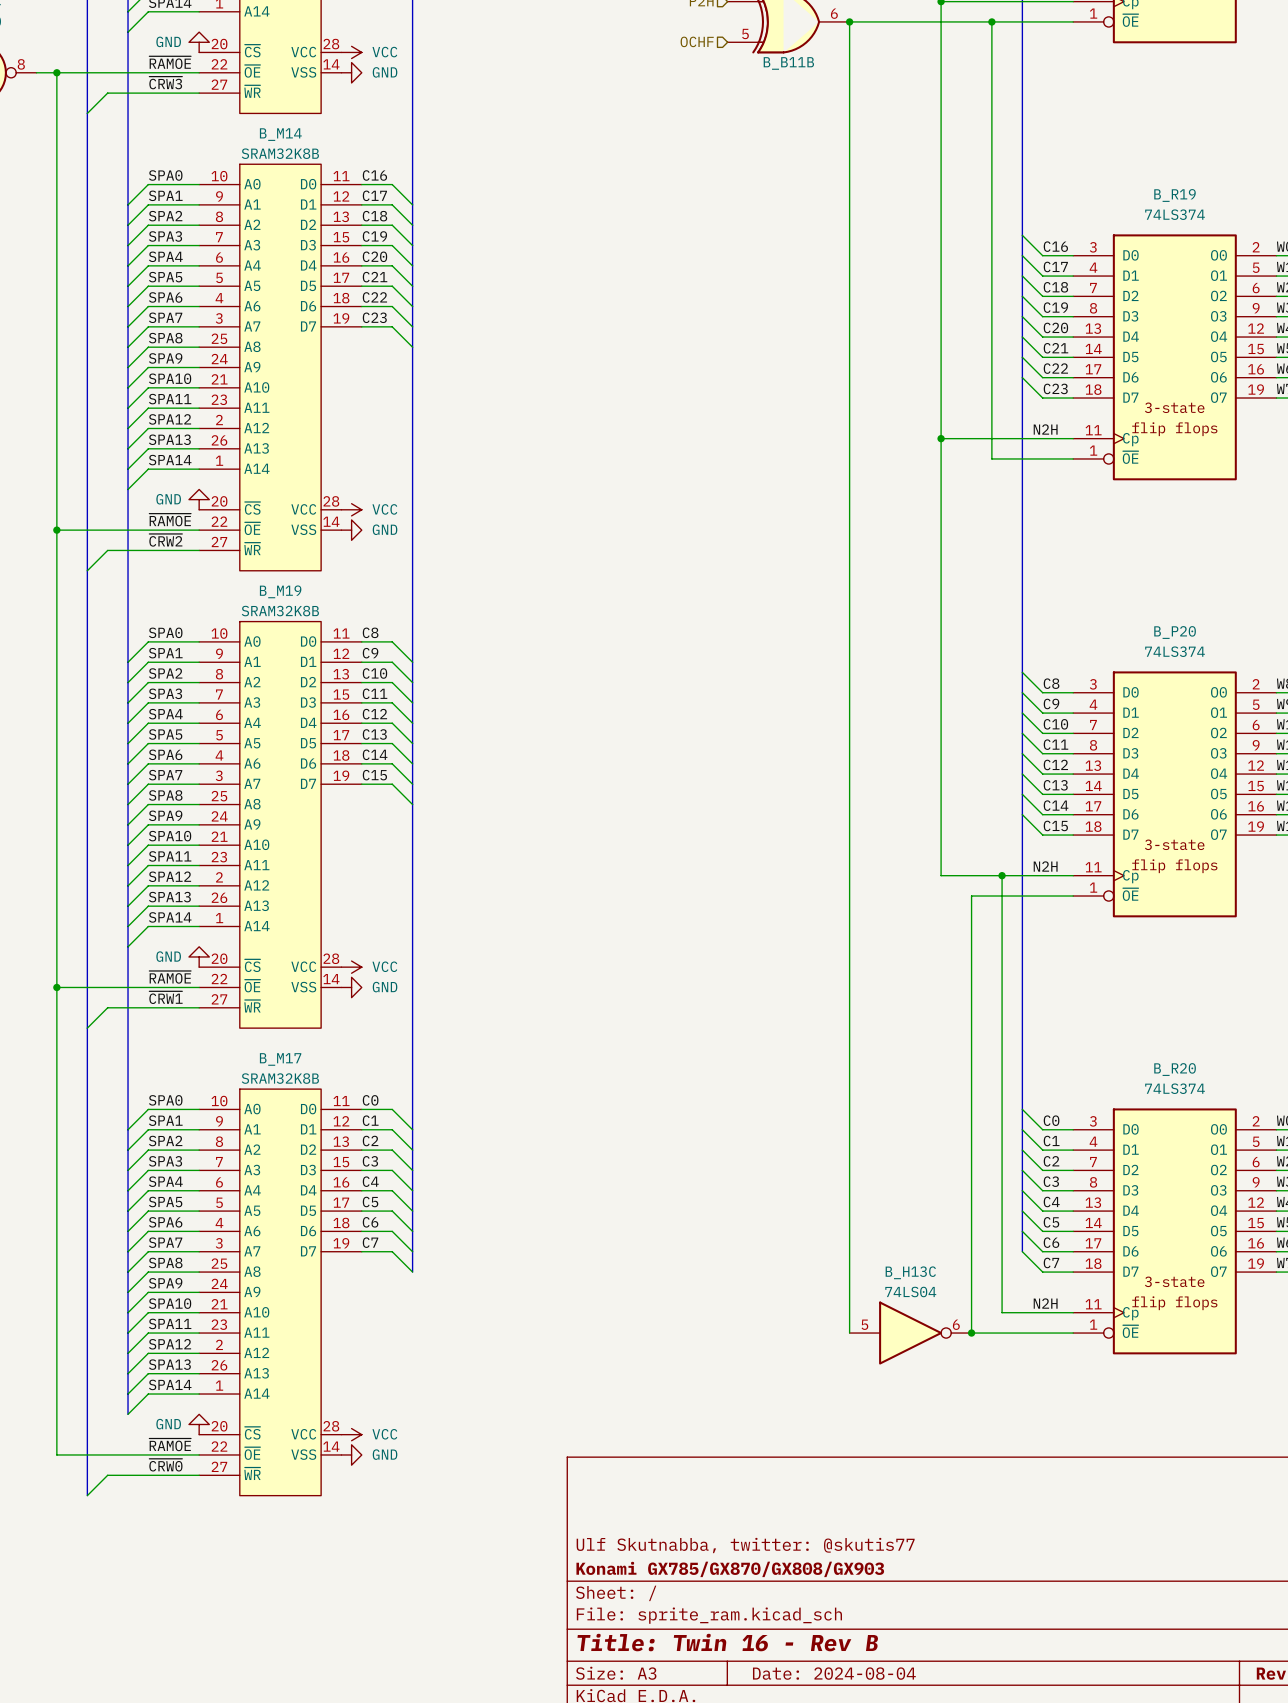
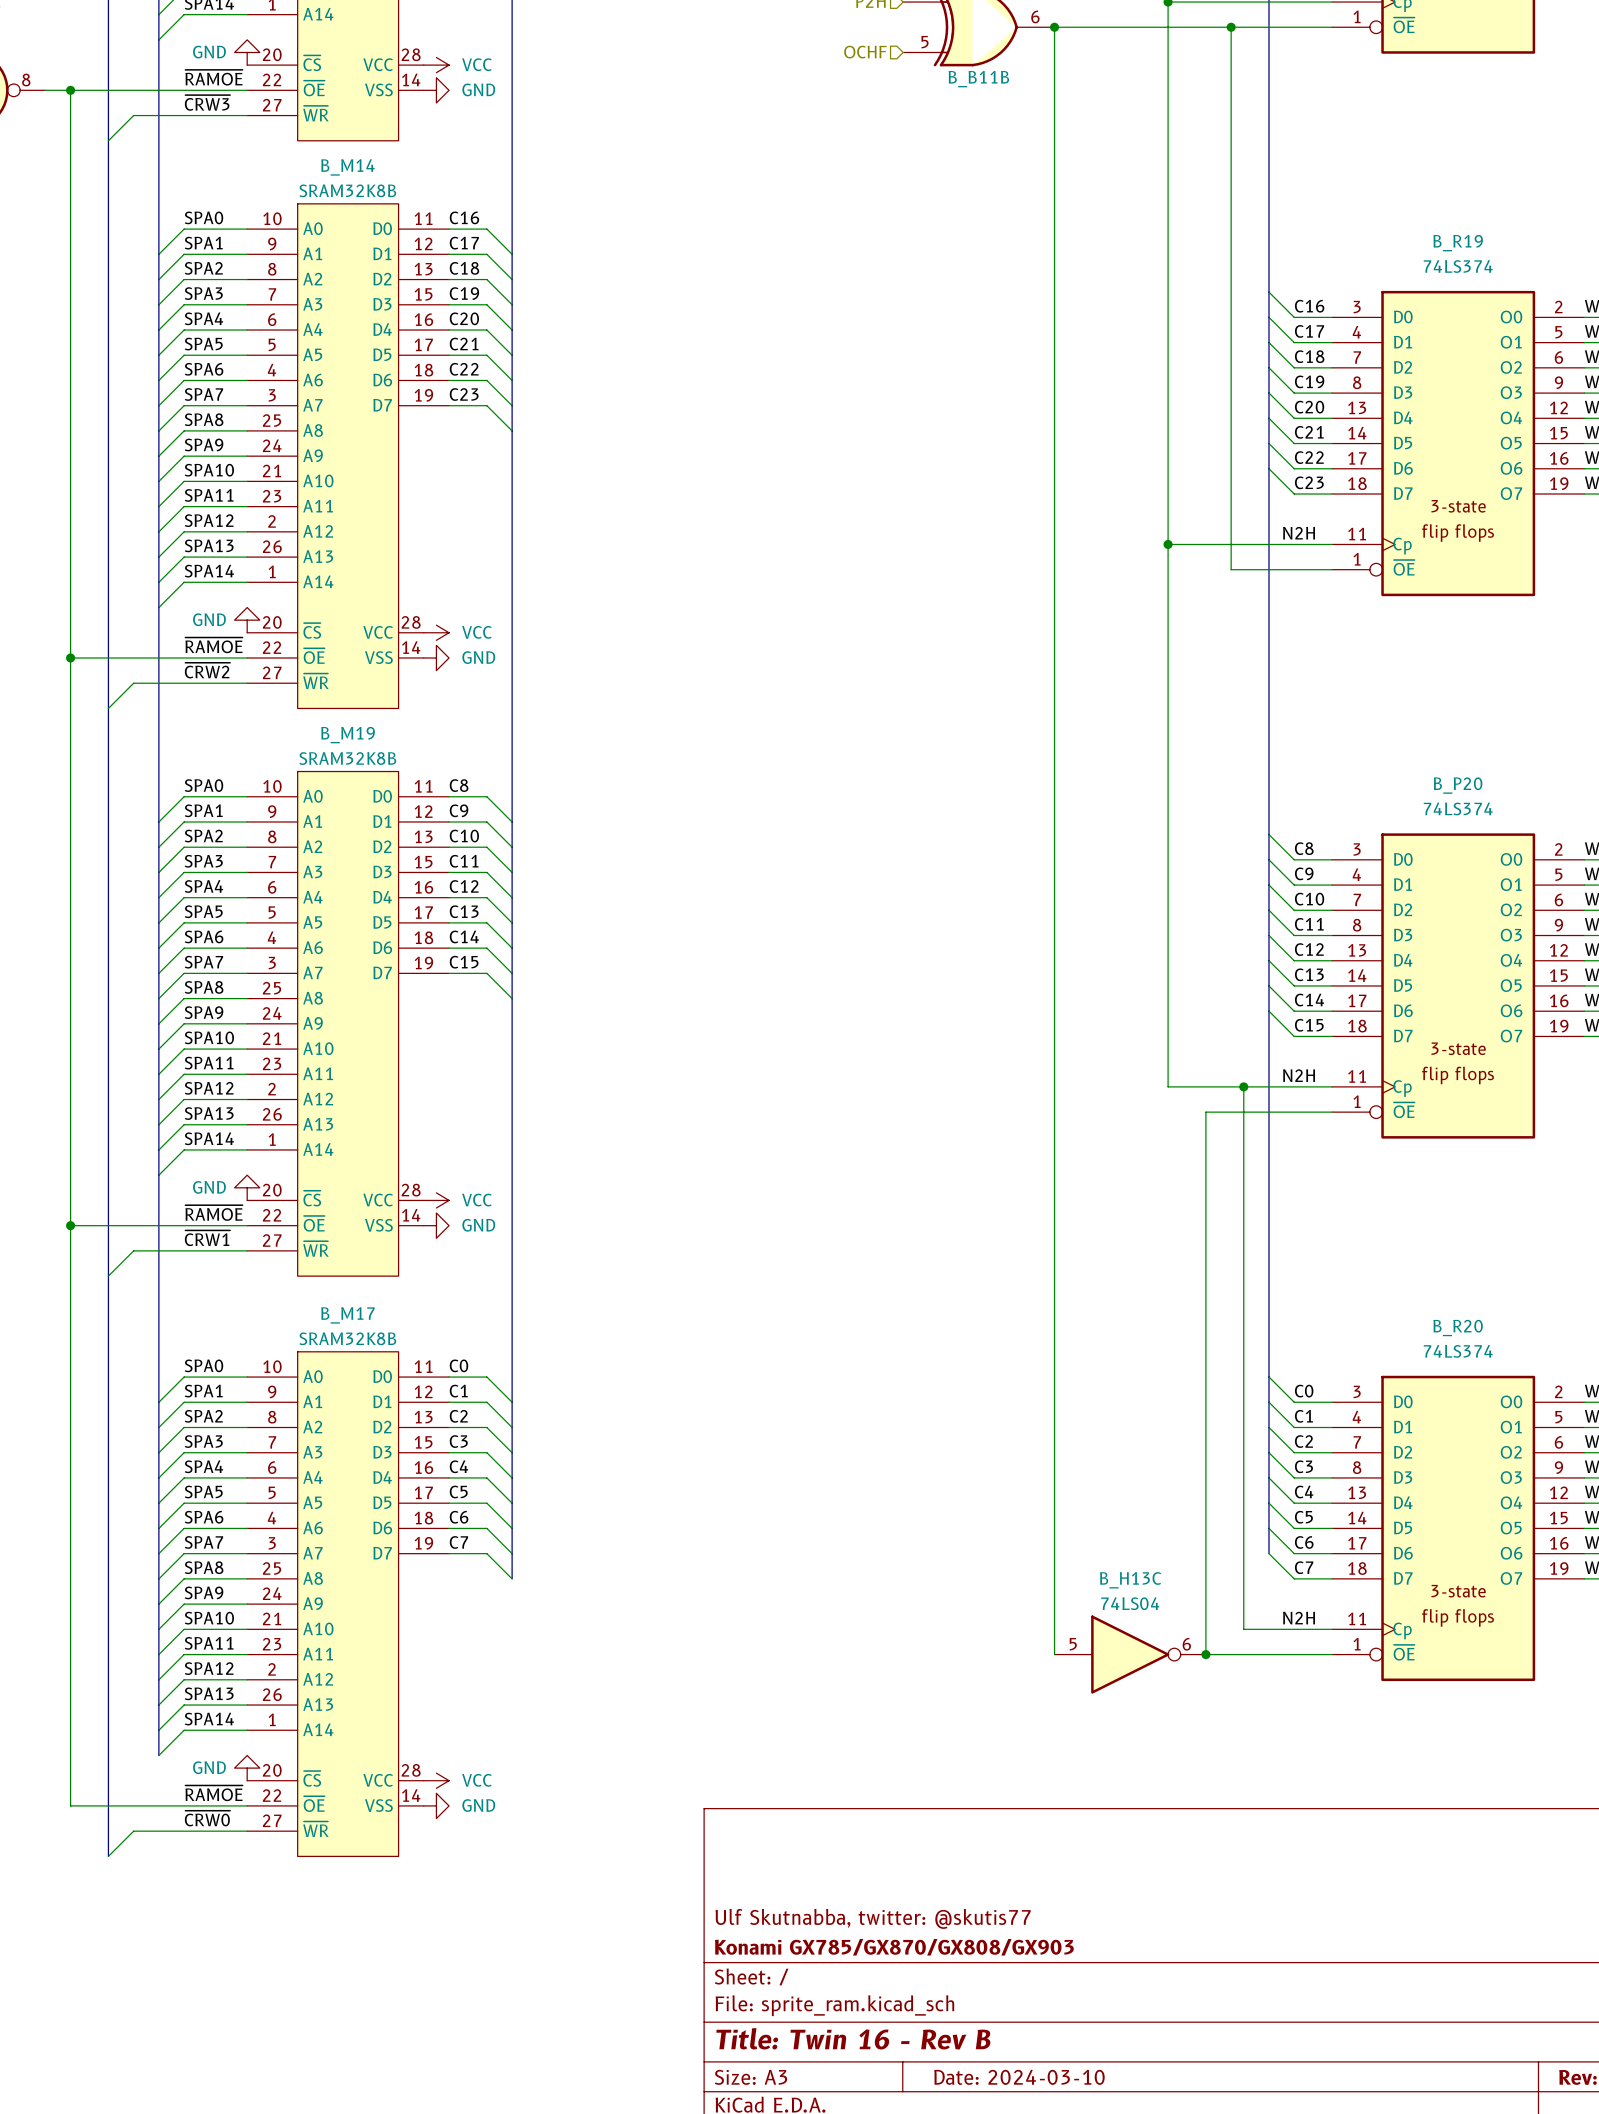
title block: Date: 2024-08-04 (834, 1673) -> Date: 2024-03-10 (1019, 2077)

